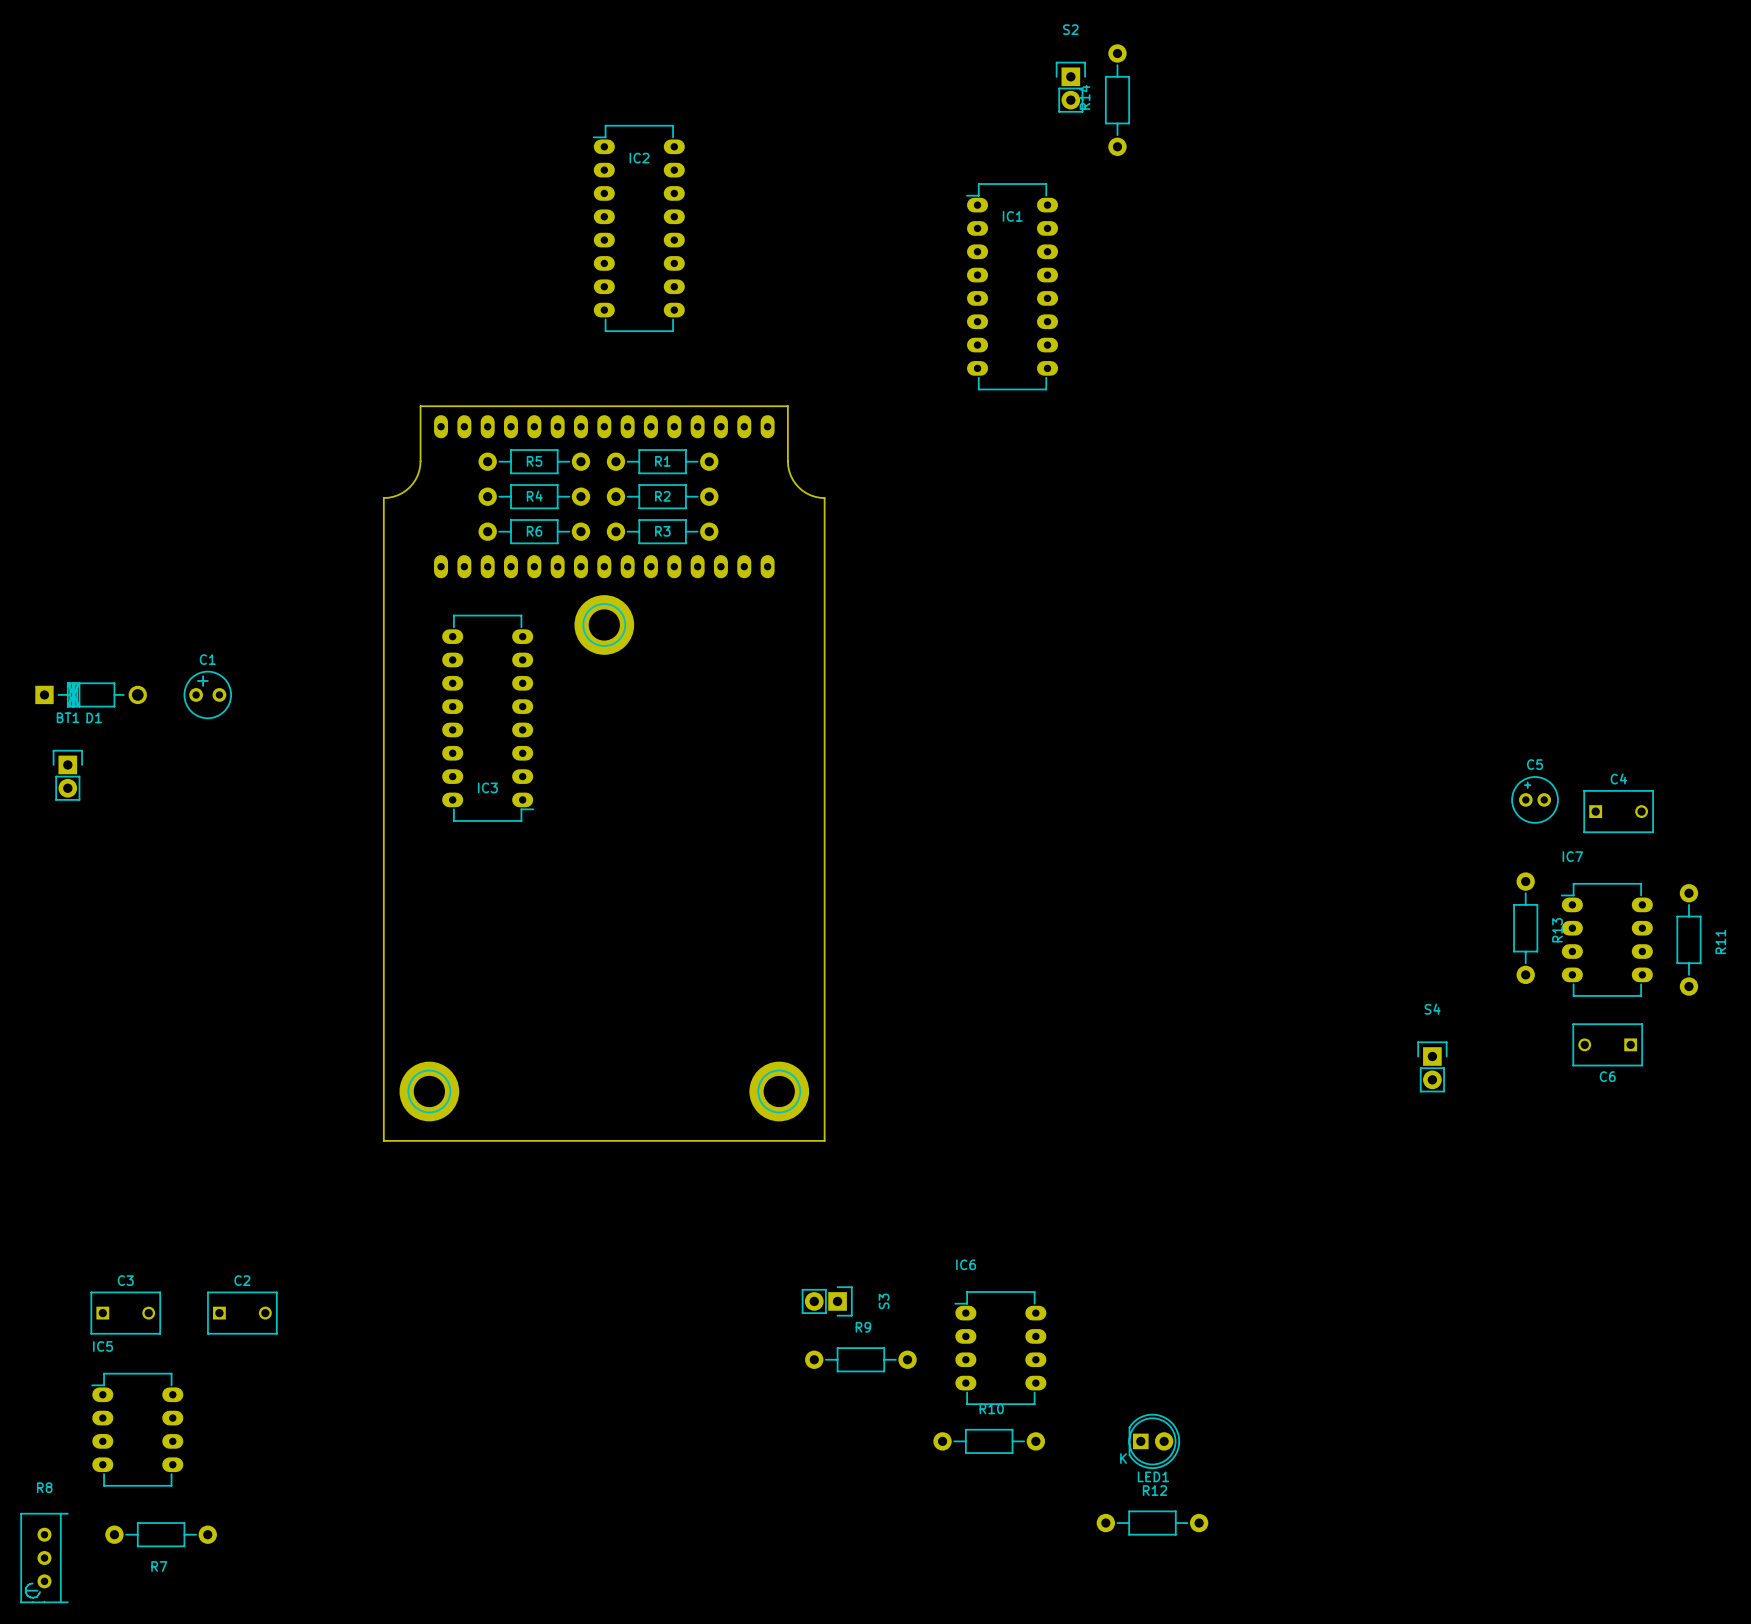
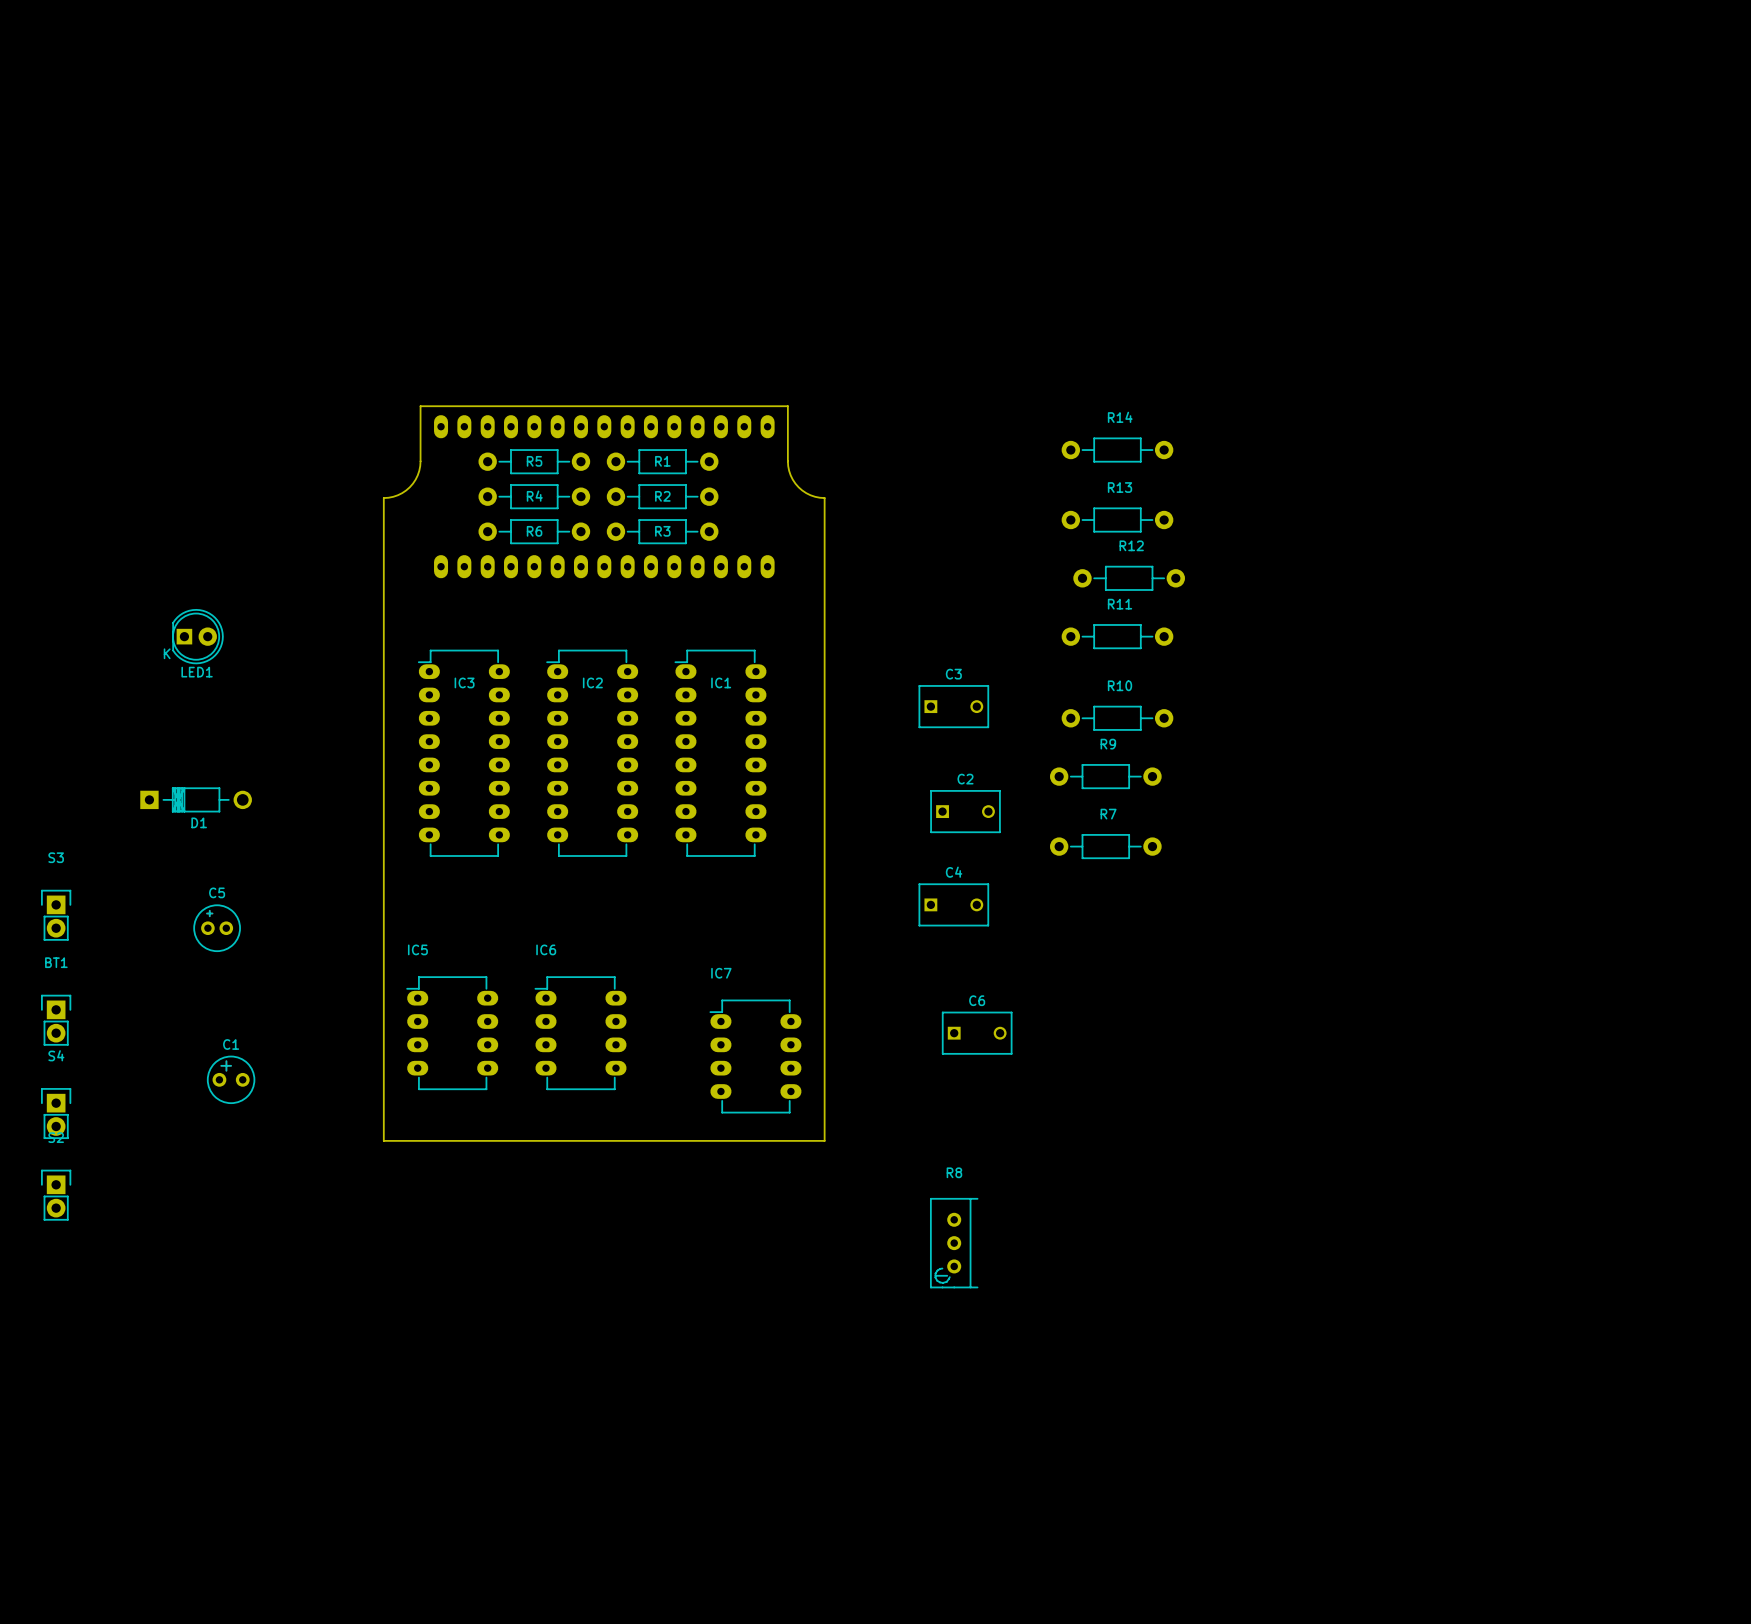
S2 position: (1070, 87) -> (56, 1195)
R14 rotation: 0° (1117, 100) -> 90° clockwise (1117, 450)
R14 position: (1117, 100) -> (1117, 450)
IC2 position: (638, 228) -> (592, 753)
IC1 position: (1012, 286) -> (720, 753)
part: (604, 624) -> none
D1 position: (91, 694) -> (196, 799)
C1 position: (207, 694) -> (231, 1079)
IC3 rotation: 0° (488, 718) -> 180° (464, 753)
BT1 position: (67, 775) -> (56, 1020)
C5 position: (1535, 799) -> (217, 928)
C4 position: (1618, 811) -> (953, 904)
R13 rotation: 0° (1525, 928) -> 90° clockwise (1117, 520)
R13 position: (1525, 928) -> (1117, 520)
R13 name position: R13 (1557, 930) -> R13 (1119, 487)
IC7 position: (1607, 939) -> (755, 1056)
R11 rotation: 0° (1688, 939) -> 90° clockwise (1117, 636)
R11 position: (1688, 939) -> (1117, 636)
R11 name position: R11 (1720, 941) -> R11 (1119, 604)
C6 rotation: 0° (1607, 1044) -> 180° (977, 1033)
C6 position: (1607, 1044) -> (977, 1033)
S4 position: (1432, 1066) -> (56, 1113)
part: (429, 1091) -> none
part: (779, 1091) -> none
S3 rotation: 0° (827, 1301) -> 90° counterclockwise (56, 915)
S3 position: (827, 1301) -> (56, 915)
C3 position: (125, 1313) -> (953, 706)
C2 position: (242, 1313) -> (965, 811)
IC6 position: (1000, 1348) -> (580, 1033)
R9 position: (860, 1359) -> (1105, 776)
IC5 position: (137, 1429) -> (452, 1033)
R10 position: (989, 1441) -> (1117, 718)
LED1 position: (1154, 1441) -> (197, 636)
R12 position: (1152, 1523) -> (1129, 578)
R7 position: (161, 1534) -> (1105, 846)
R8 position: (44, 1558) -> (954, 1243)
R7 name position: R7 (159, 1566) -> R7 (1108, 814)

